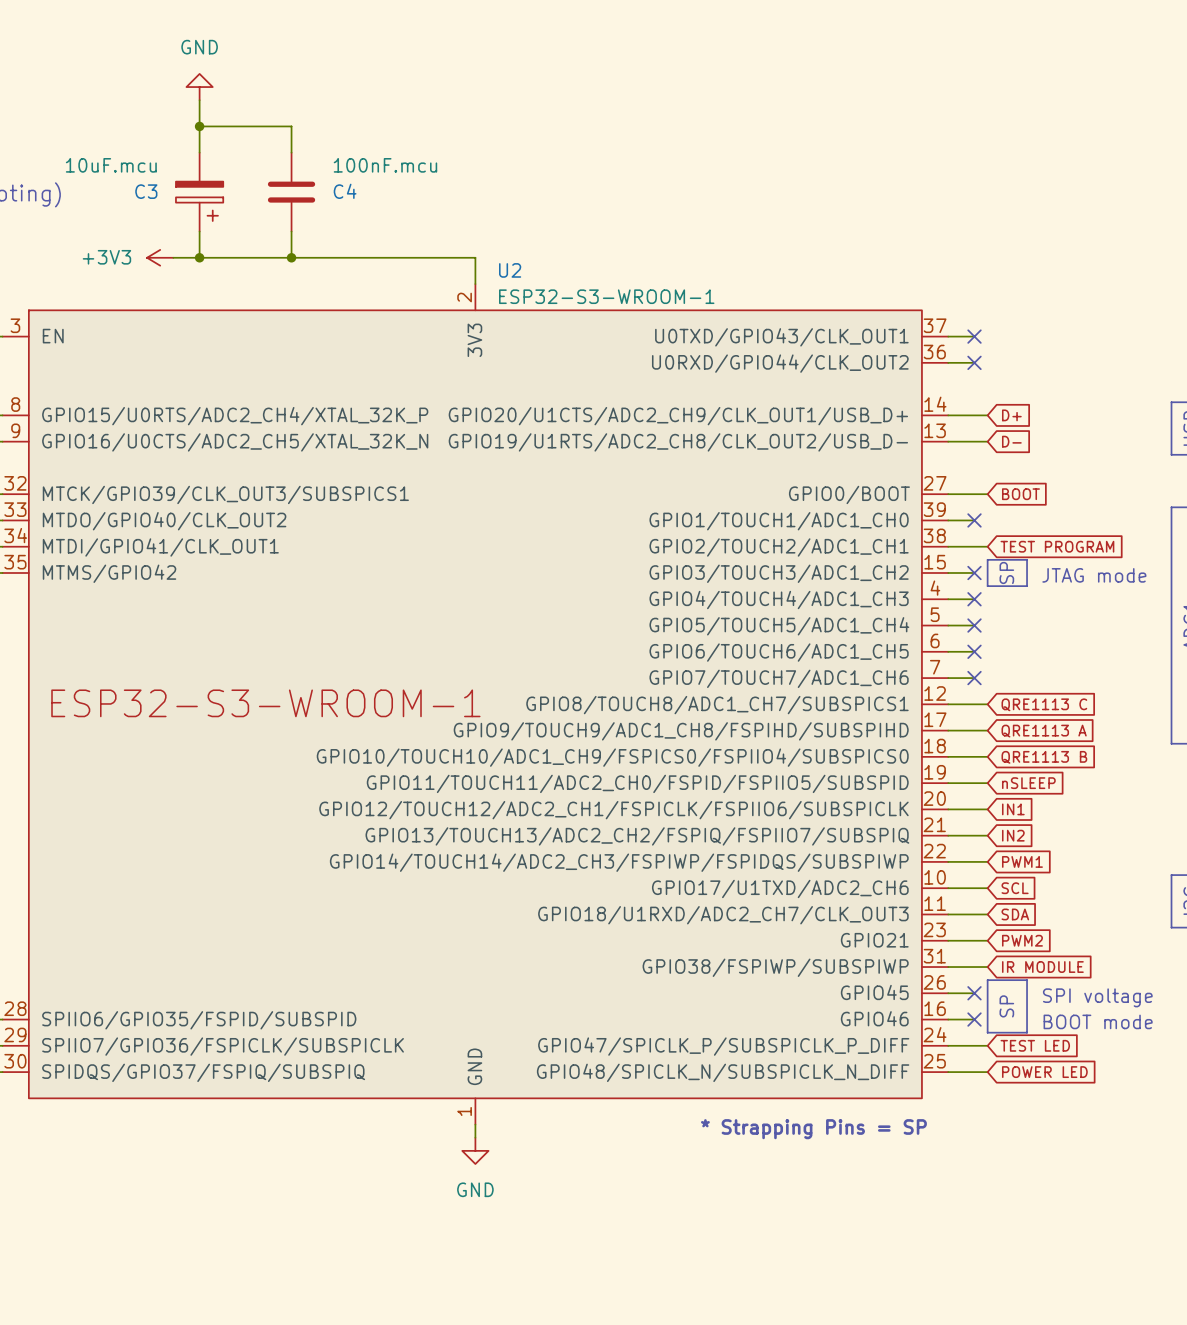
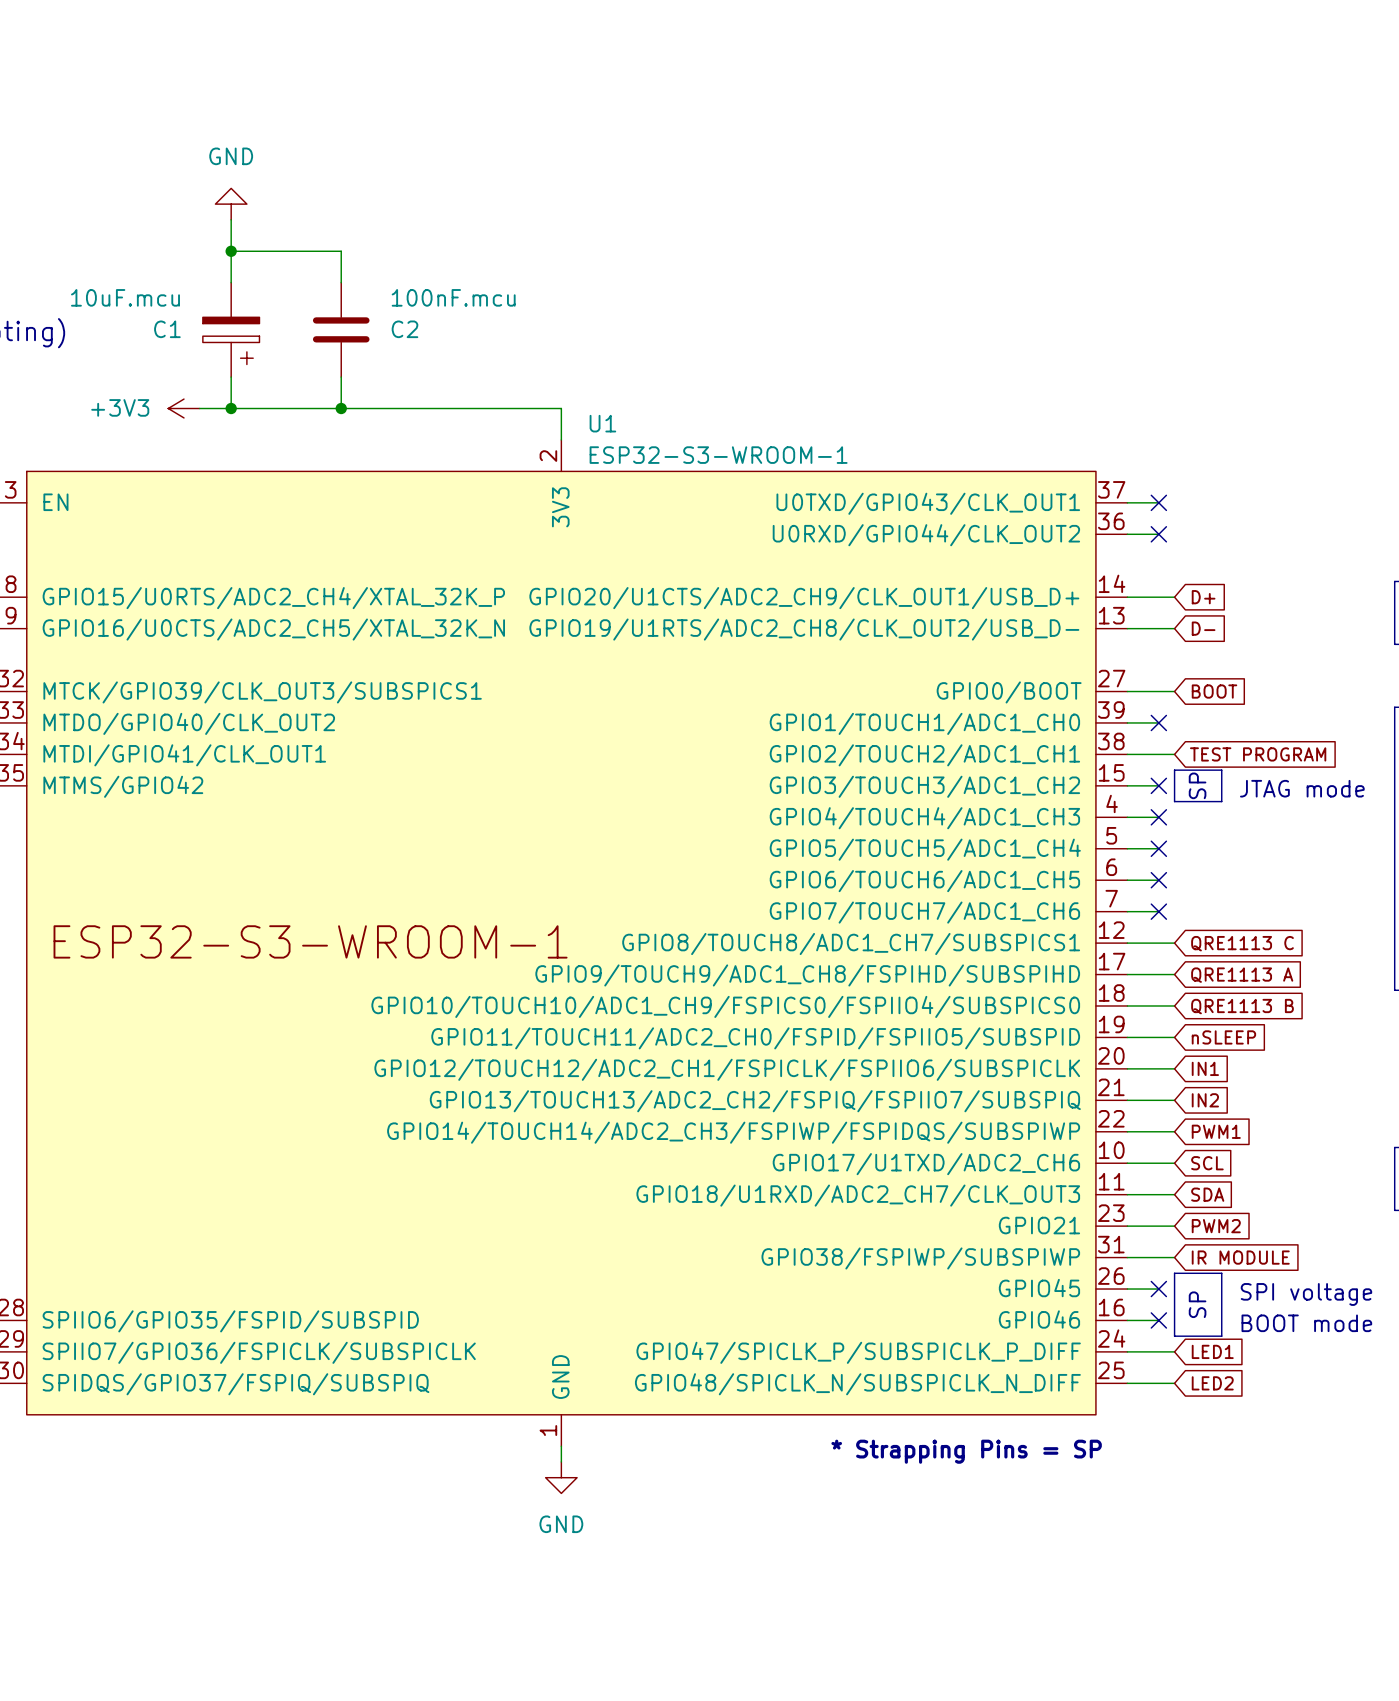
C3 name: C3 (146, 191) -> C1 (167, 329)
C4 name: C4 (345, 191) -> C2 (405, 329)
U2 name: U2 (510, 270) -> U1 (602, 423)
global label: TEST LED (1035, 1045) -> LED1 (1212, 1351)
global label: POWER LED (1044, 1072) -> LED2 (1212, 1383)

